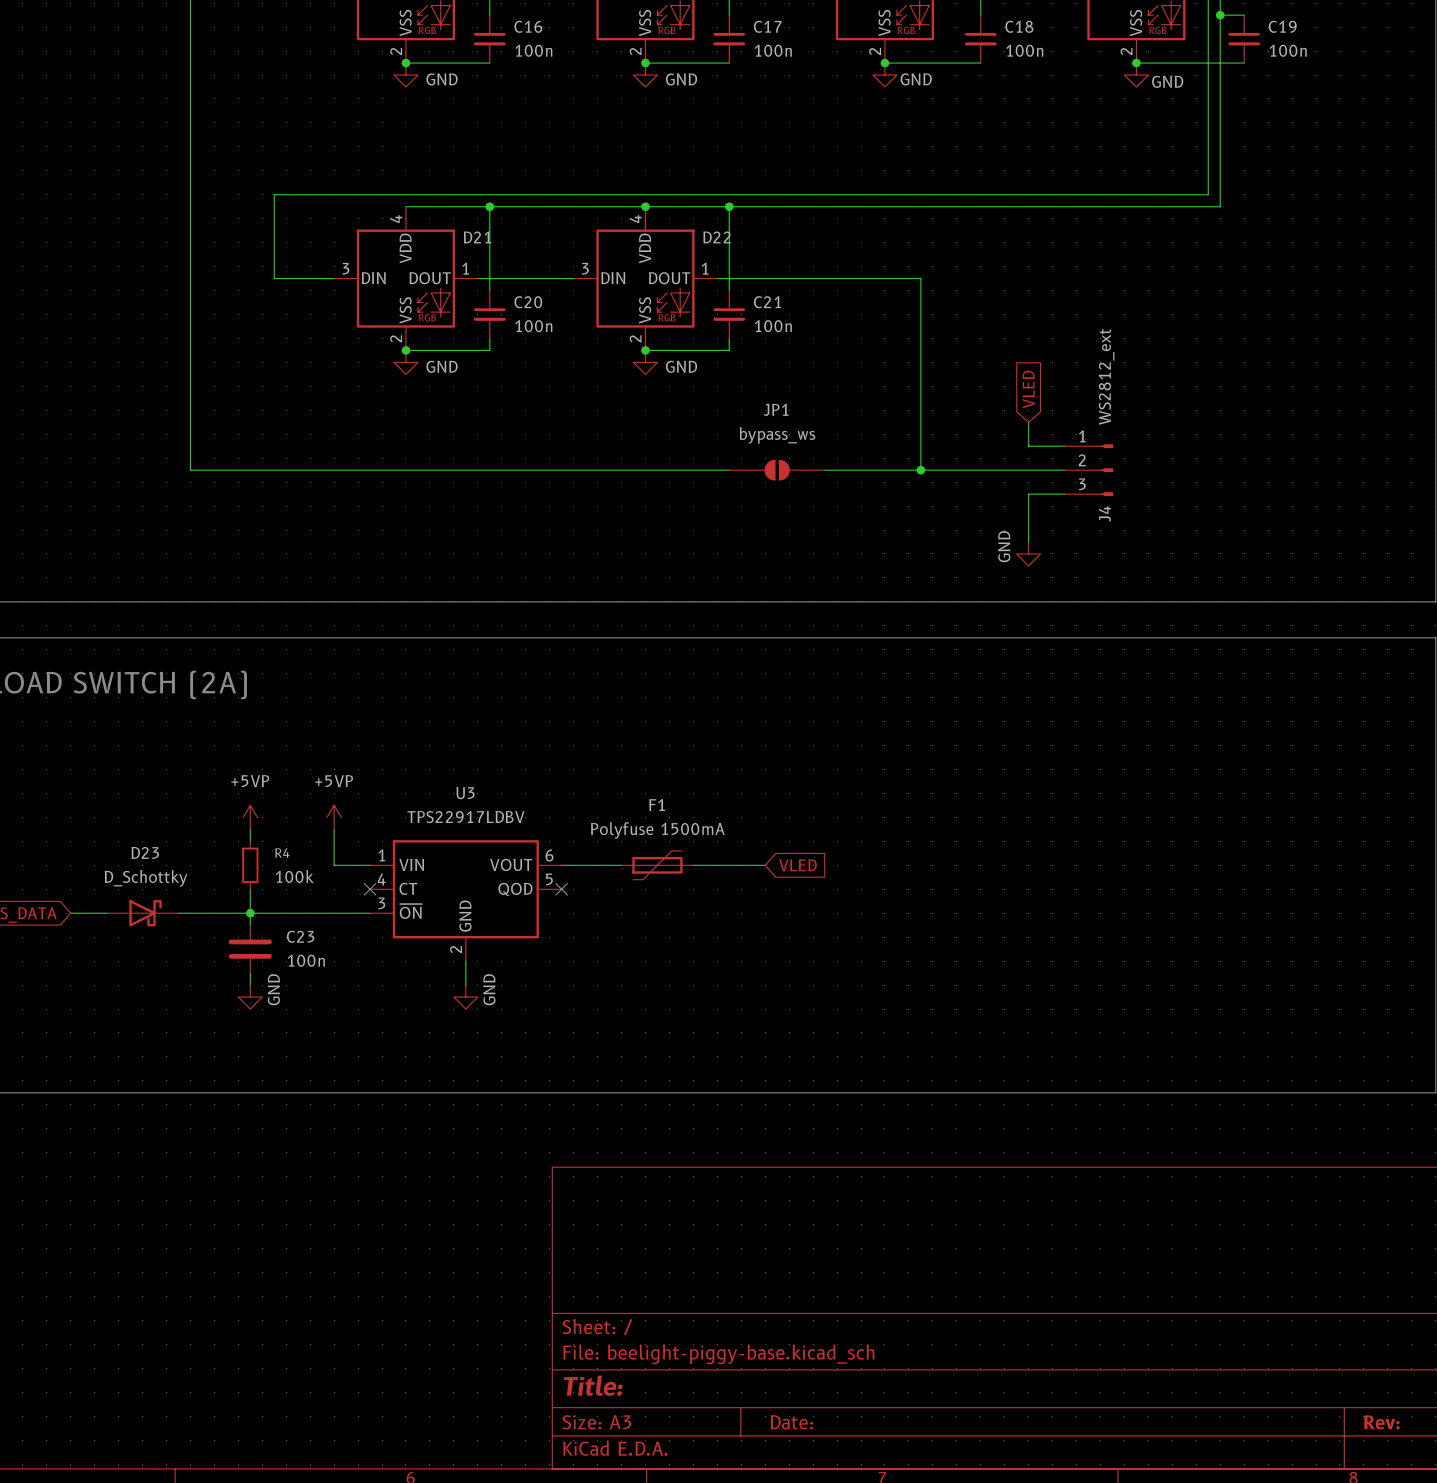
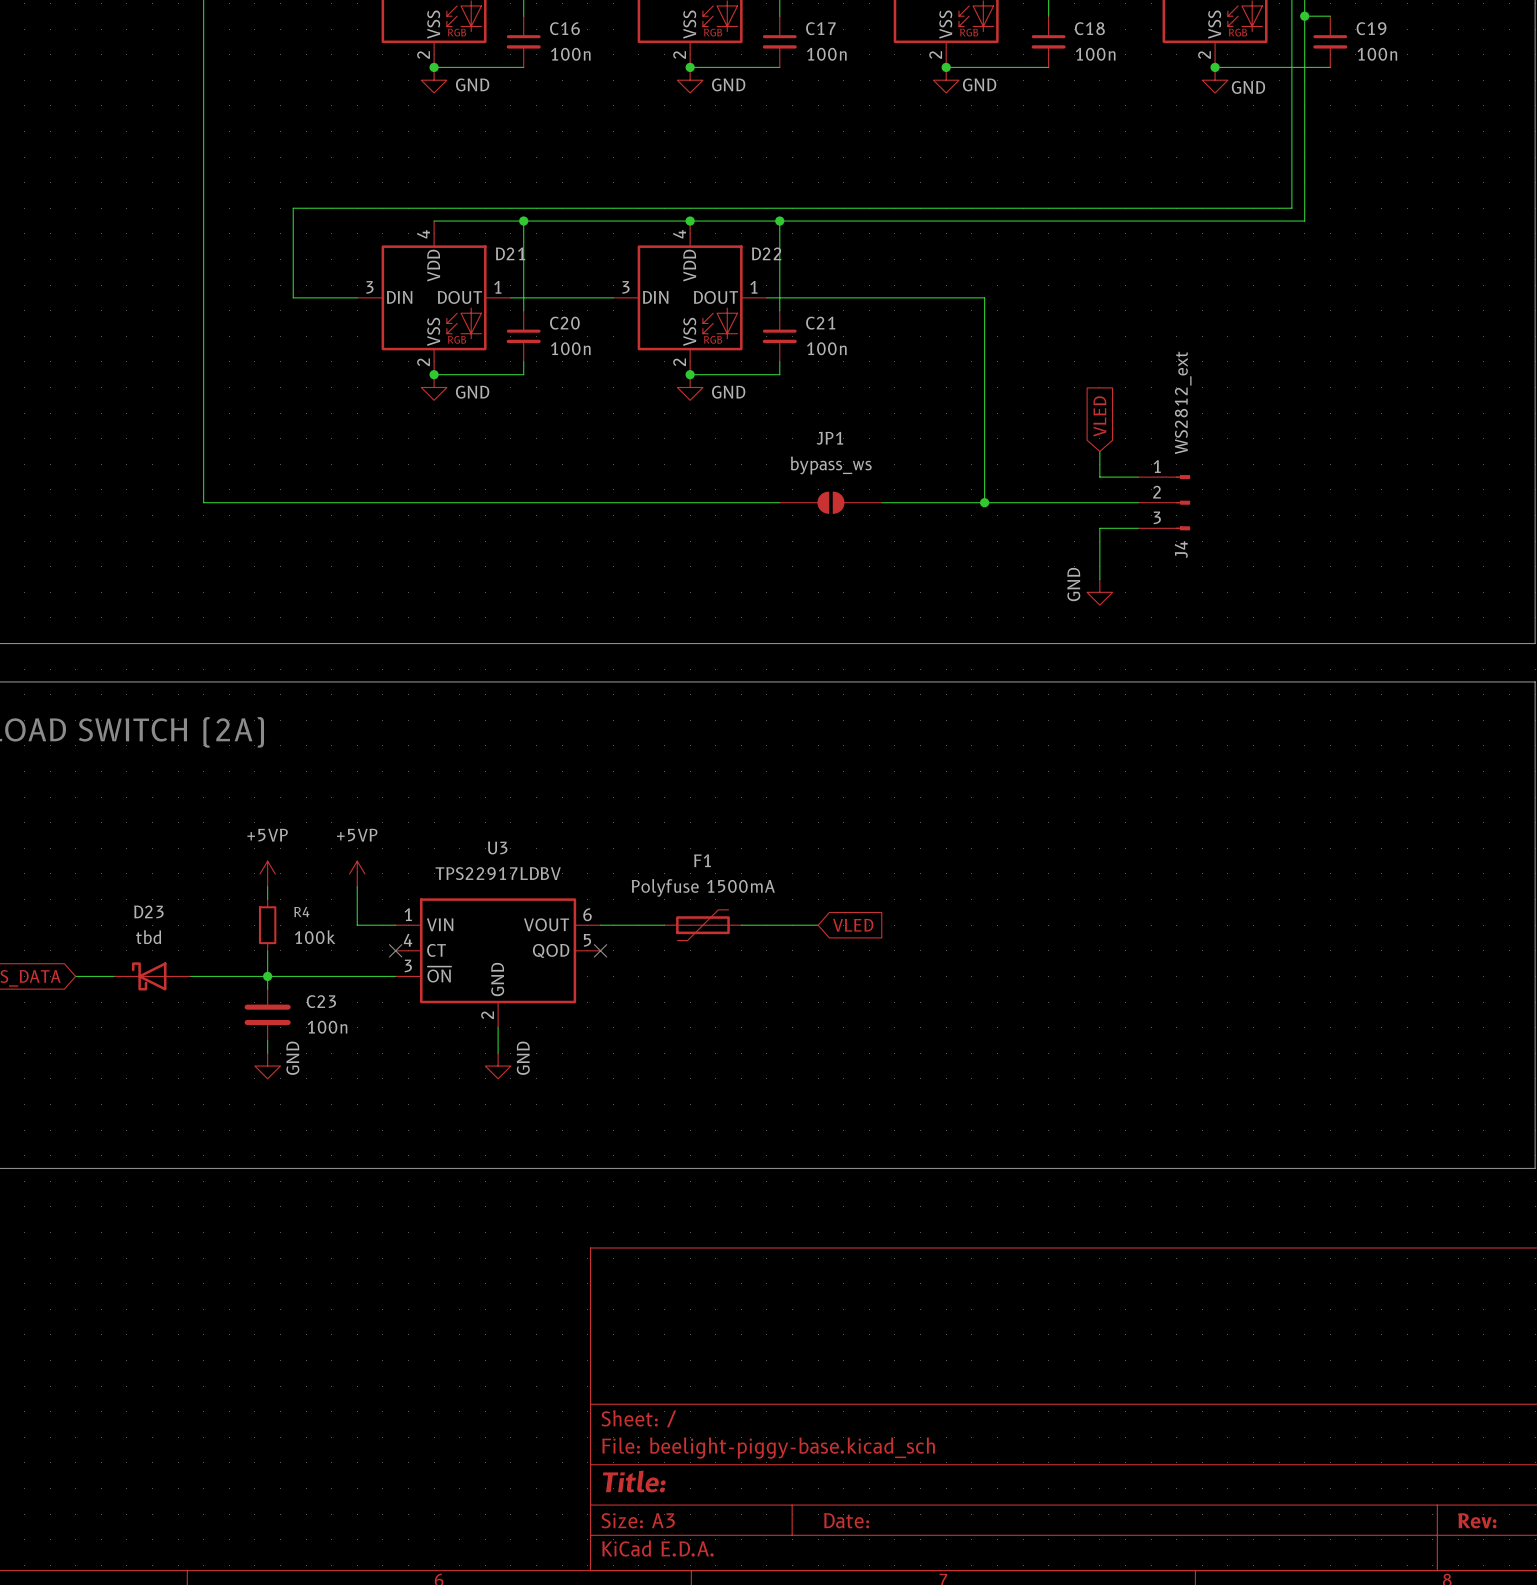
D23 value: D_Schottky (146, 878) -> tbd (148, 937)
D23 flip: as is (145, 913) -> left-right (149, 976)

